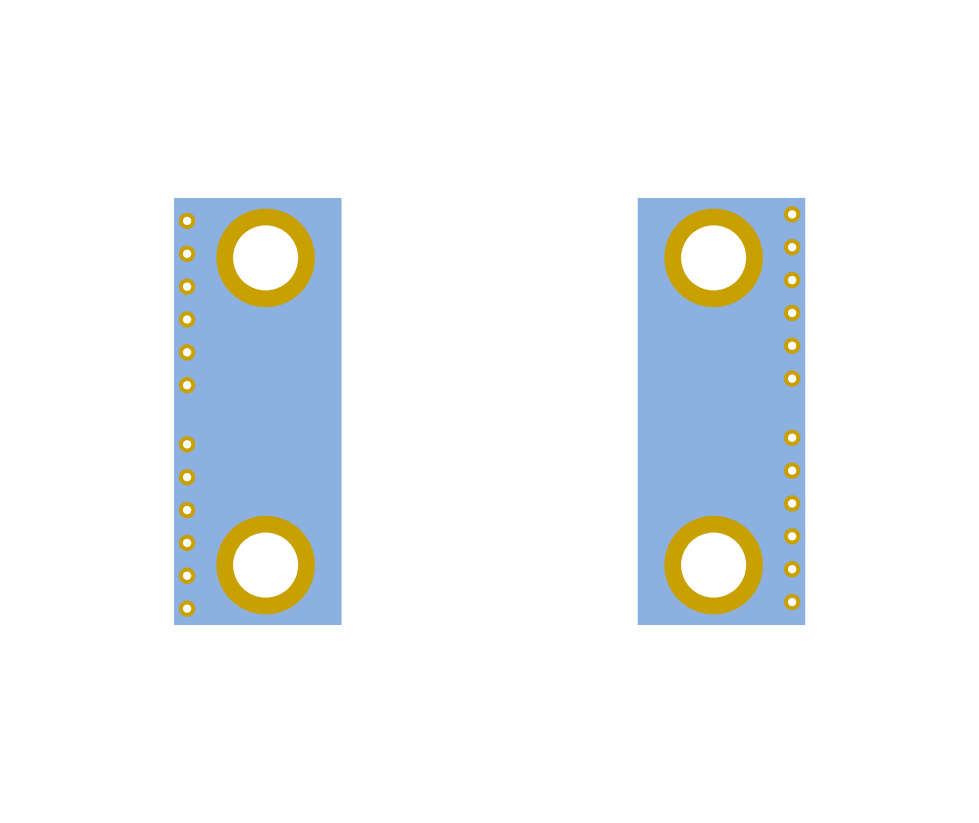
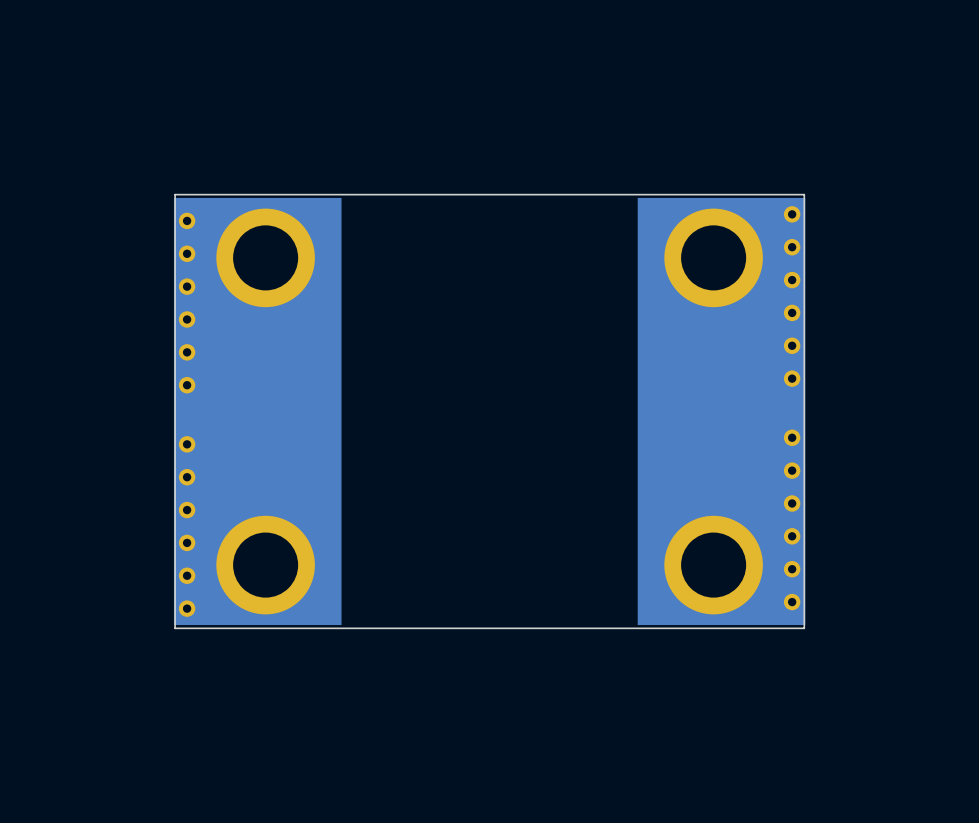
board edge: none -> (804, 194) (175, 194) (175, 628) (804, 628) (804, 194)

